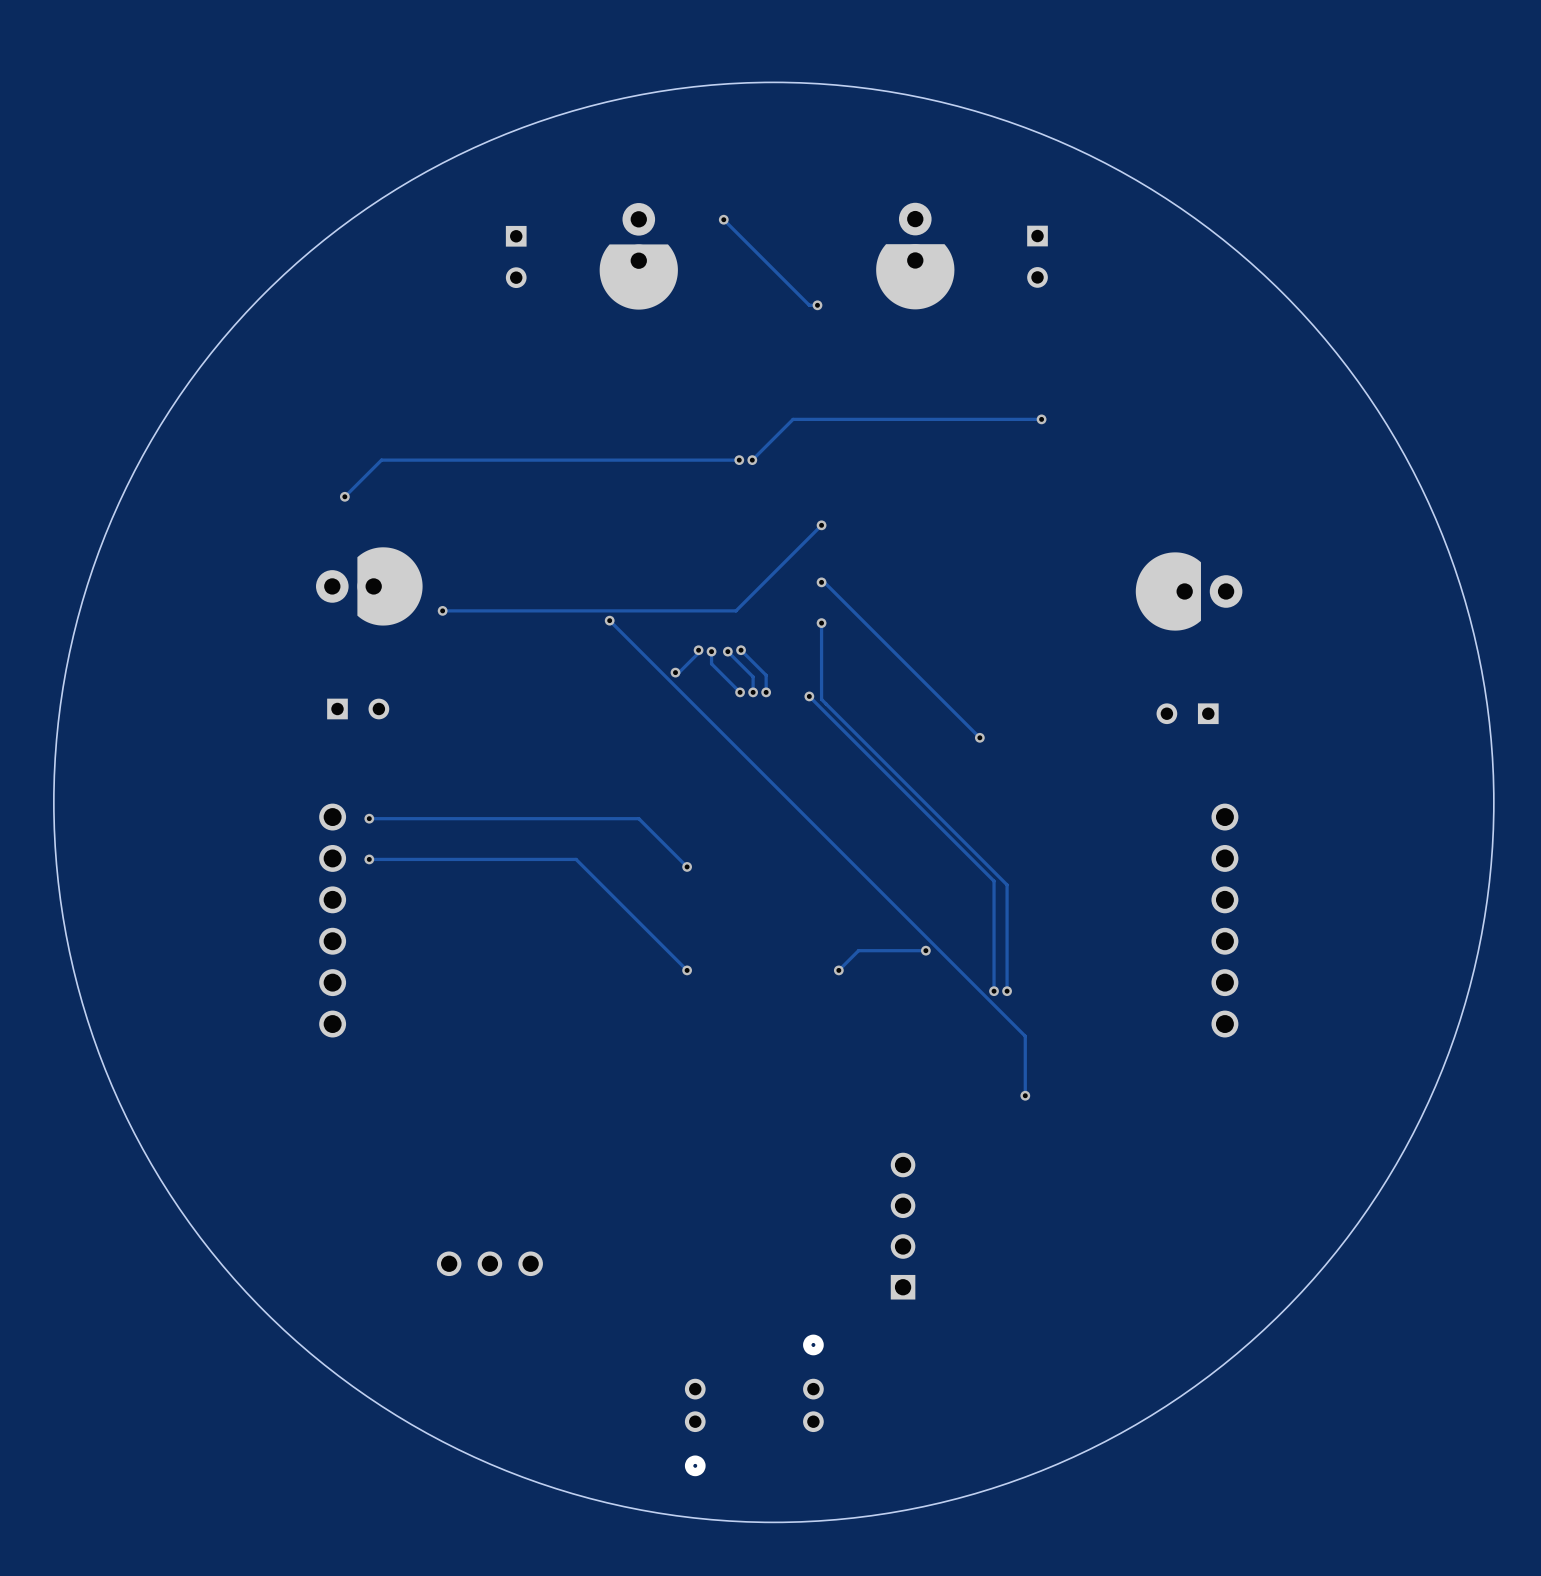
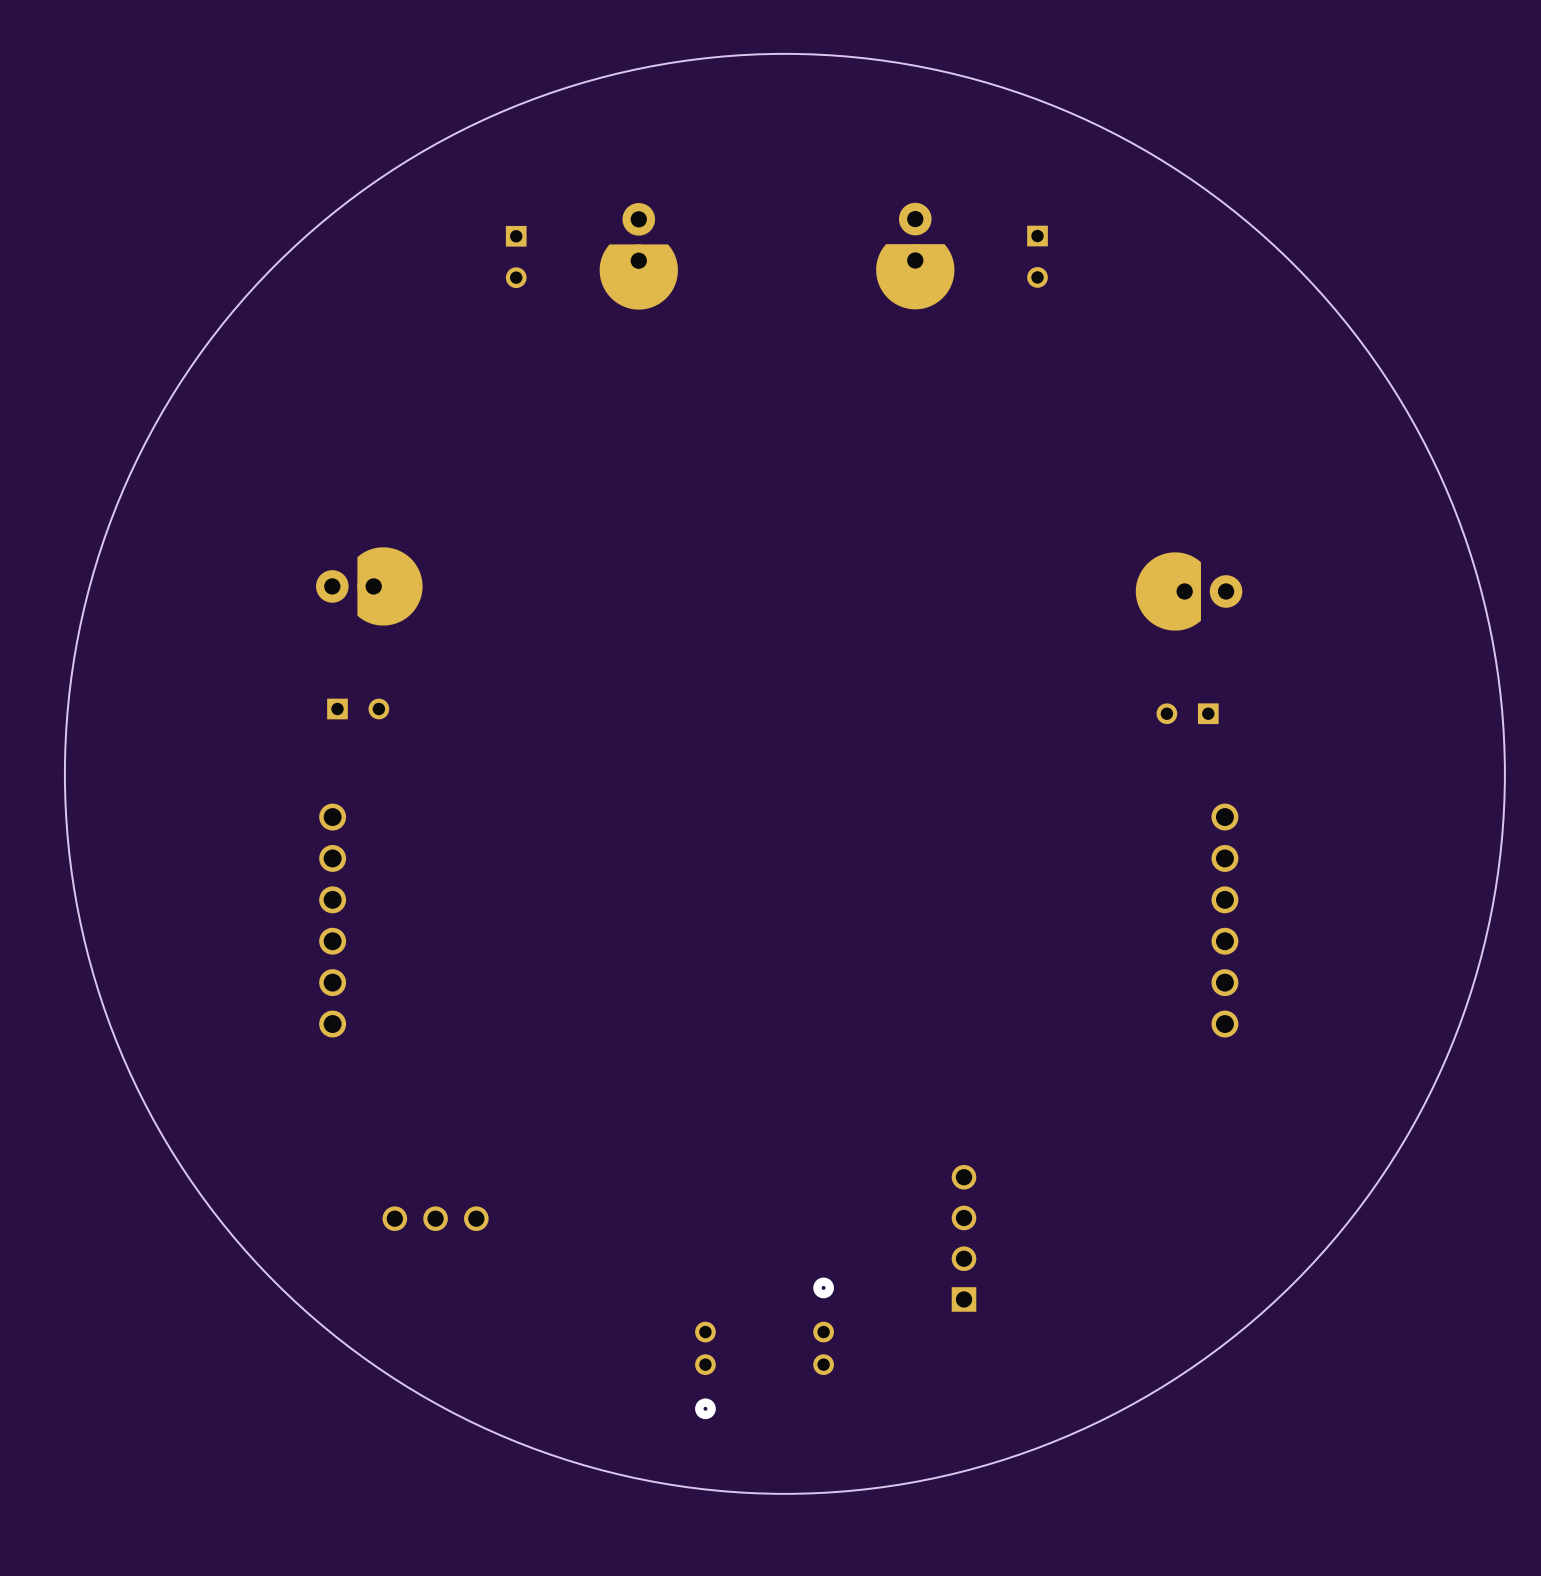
track: (723, 219) (809, 305) (817, 305) -> none
via: (723, 219) -> none
via: (817, 305) -> none
track: (1041, 419) (793, 419) (752, 460) -> none
via: (1041, 419) -> none
track: (739, 460) (381, 460) (344, 496) -> none
via: (739, 460) -> none
via: (752, 460) -> none
via: (344, 496) -> none
track: (821, 525) (736, 610) (442, 610) -> none
via: (821, 525) -> none
track: (821, 582) (824, 582) (979, 737) -> none
via: (821, 582) -> none
via: (442, 610) -> none
track: (609, 620) (1025, 1036) (1025, 1095) -> none
via: (609, 620) -> none
track: (821, 623) (821, 699) (1007, 884) (1007, 991) -> none
via: (821, 623) -> none
track: (698, 650) (698, 653) (679, 672) (675, 672) -> none
via: (698, 650) -> none
track: (741, 650) (766, 675) (766, 692) -> none
via: (741, 650) -> none
track: (711, 651) (711, 663) (740, 692) -> none
via: (711, 651) -> none
track: (727, 651) (753, 676) (753, 692) -> none
via: (727, 651) -> none
via: (675, 672) -> none
via: (740, 692) -> none
via: (753, 692) -> none
via: (766, 692) -> none
track: (809, 696) (994, 881) (994, 991) -> none
via: (809, 696) -> none
via: (979, 737) -> none
round board edge position: (773, 802) -> (784, 773)
track: (369, 818) (638, 818) (687, 866) -> none
via: (369, 818) -> none
track: (369, 859) (576, 859) (687, 970) -> none
via: (369, 859) -> none
via: (687, 866) -> none
track: (925, 950) (858, 950) (838, 970) -> none
via: (925, 950) -> none
via: (687, 970) -> none
via: (838, 970) -> none
via: (994, 991) -> none
via: (1007, 991) -> none
via: (1025, 1095) -> none
part position: (903, 1226) -> (964, 1238)
part position: (489, 1263) -> (435, 1218)
part: none -> (823, 1326)
part: none -> (705, 1370)
part: (813, 1383) -> none
part: (695, 1427) -> none

